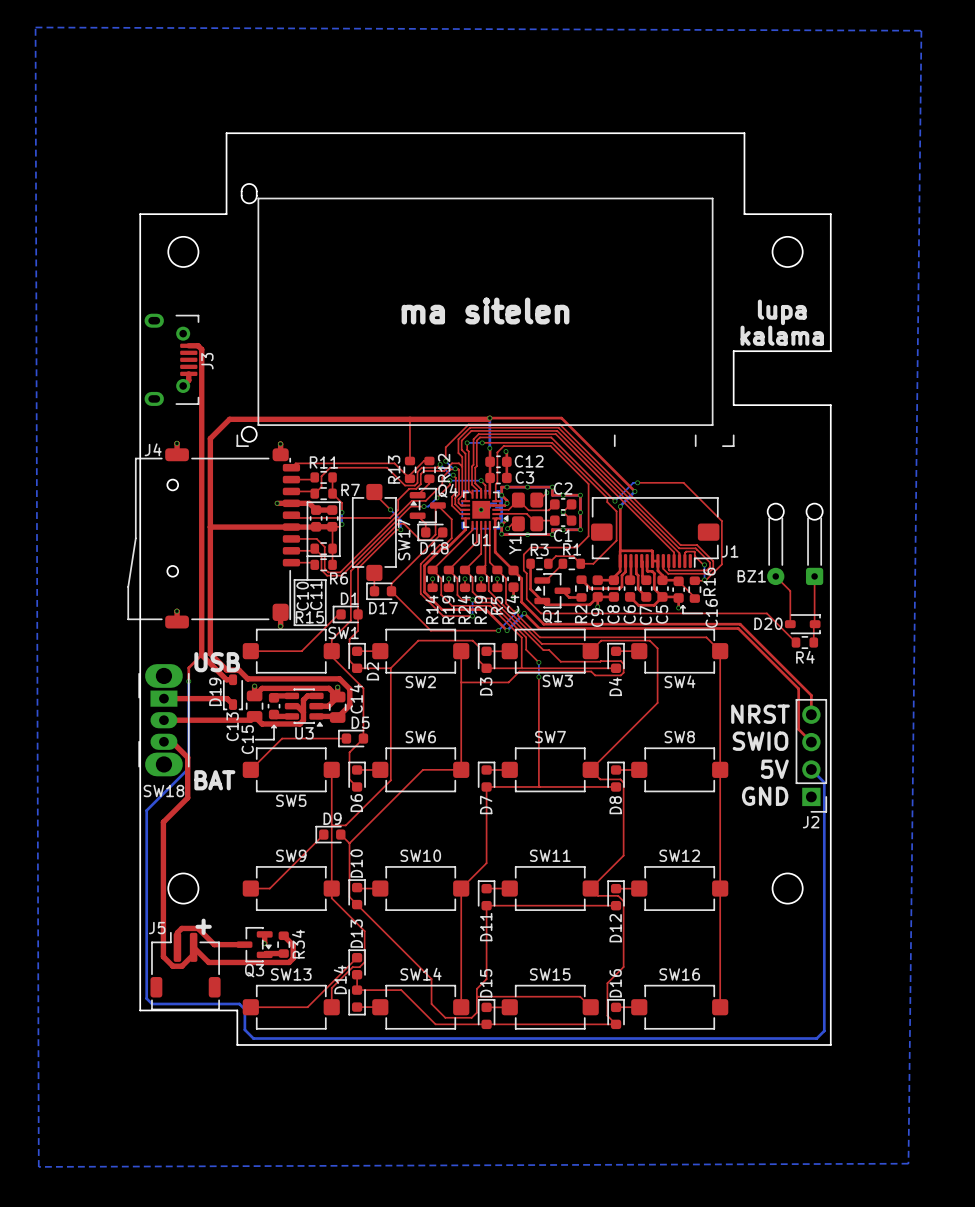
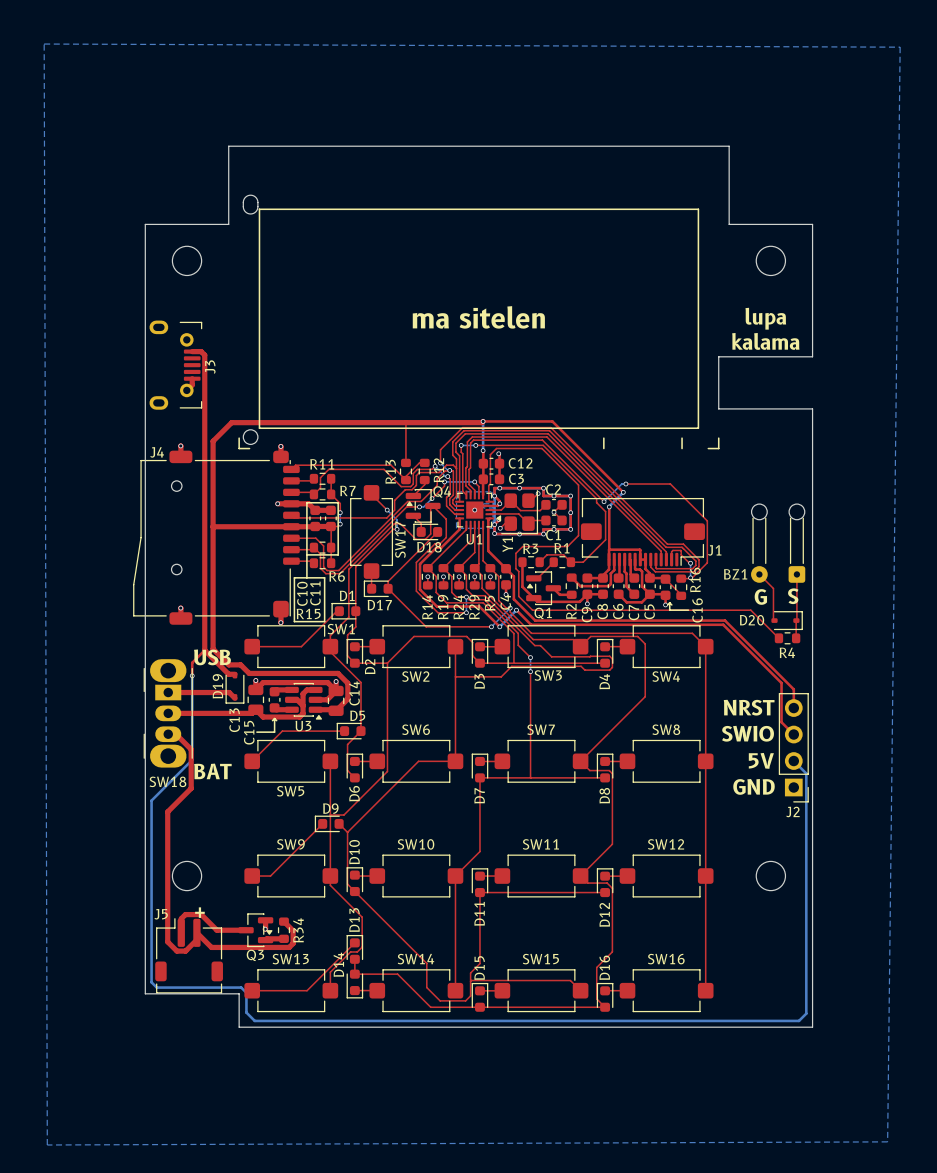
text: none -> G (760, 596)
text: none -> S (793, 596)
D20 footprint: [784, 614, 821, 635] -> [771, 611, 803, 631]
D19 footprint: [223, 674, 243, 711] -> [225, 672, 245, 704]

